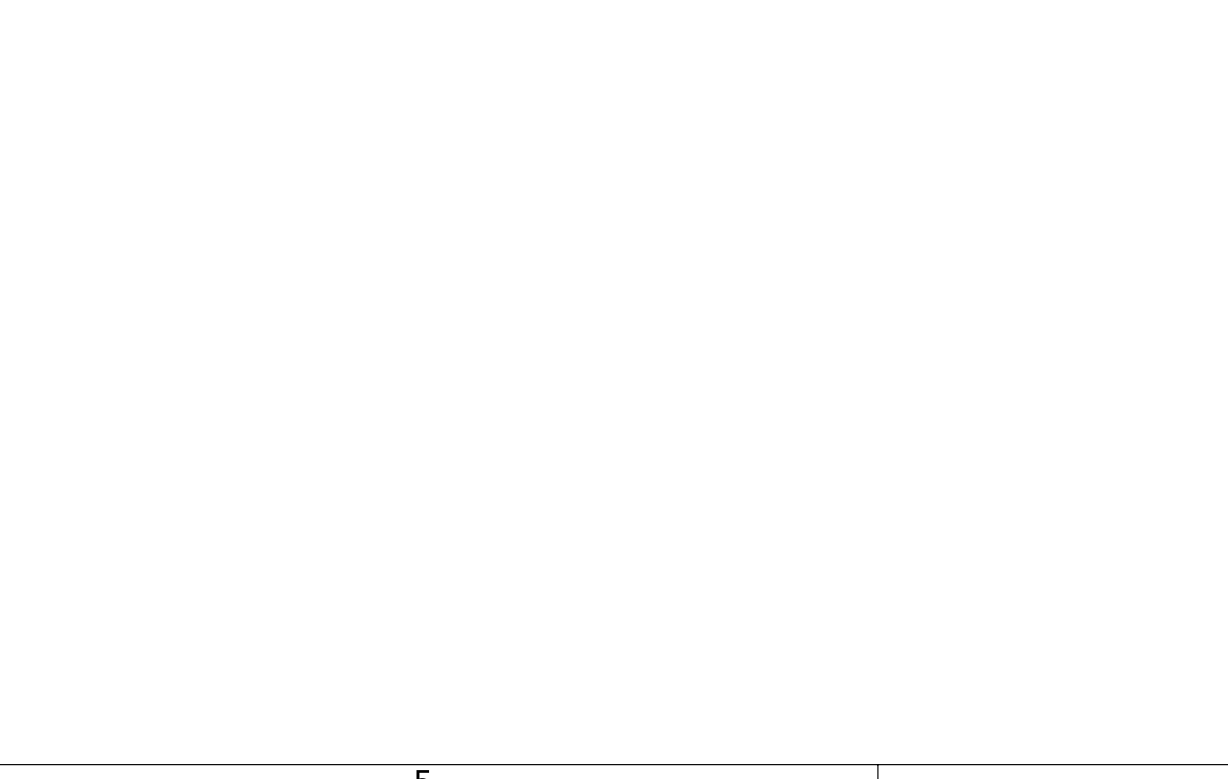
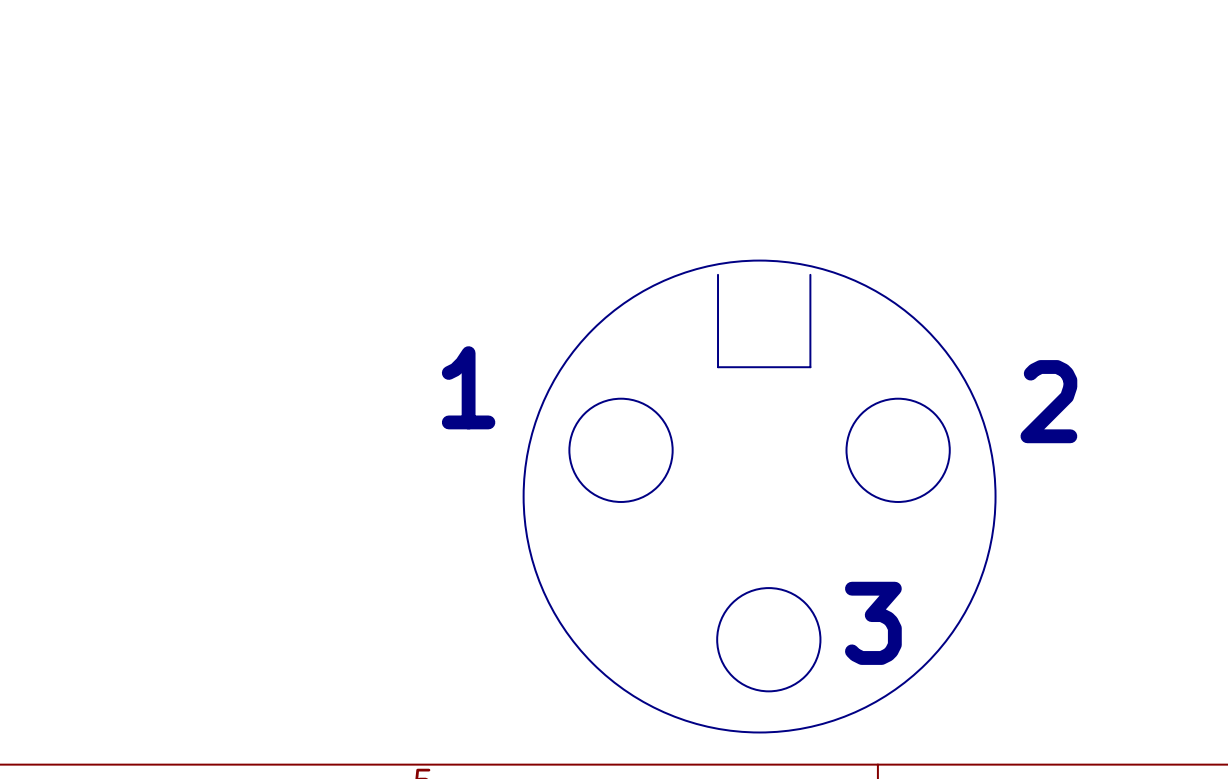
drawing: none -> [523, 260, 996, 733]
line: none -> (718, 274) (718, 367) (810, 367) (810, 274)
text: none -> 1 (468, 387)
text: none -> 2 (1048, 401)
text: none -> 3 (873, 623)

